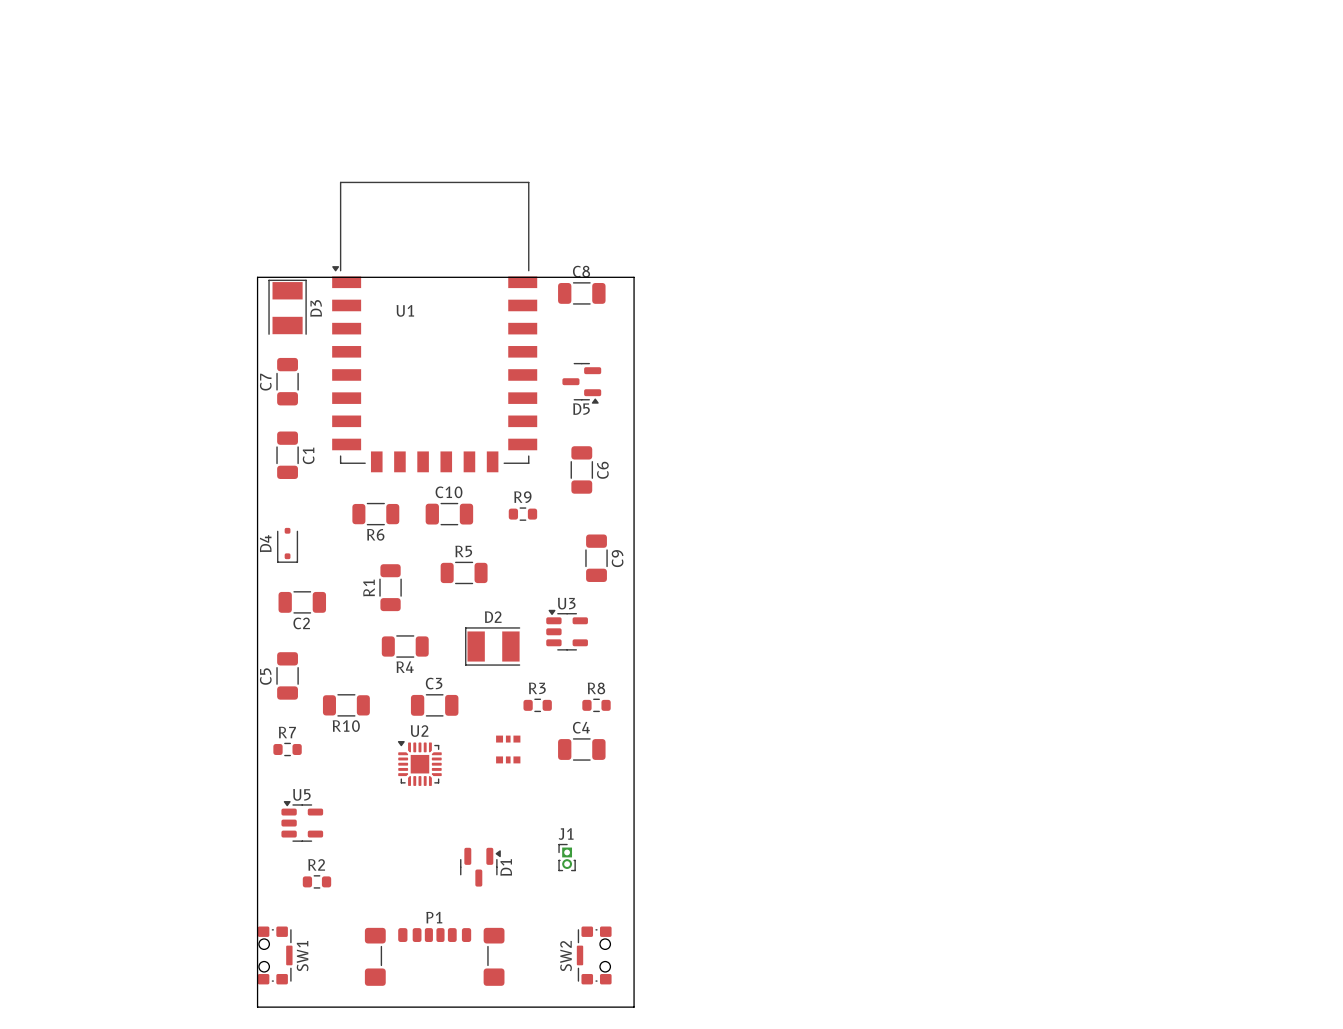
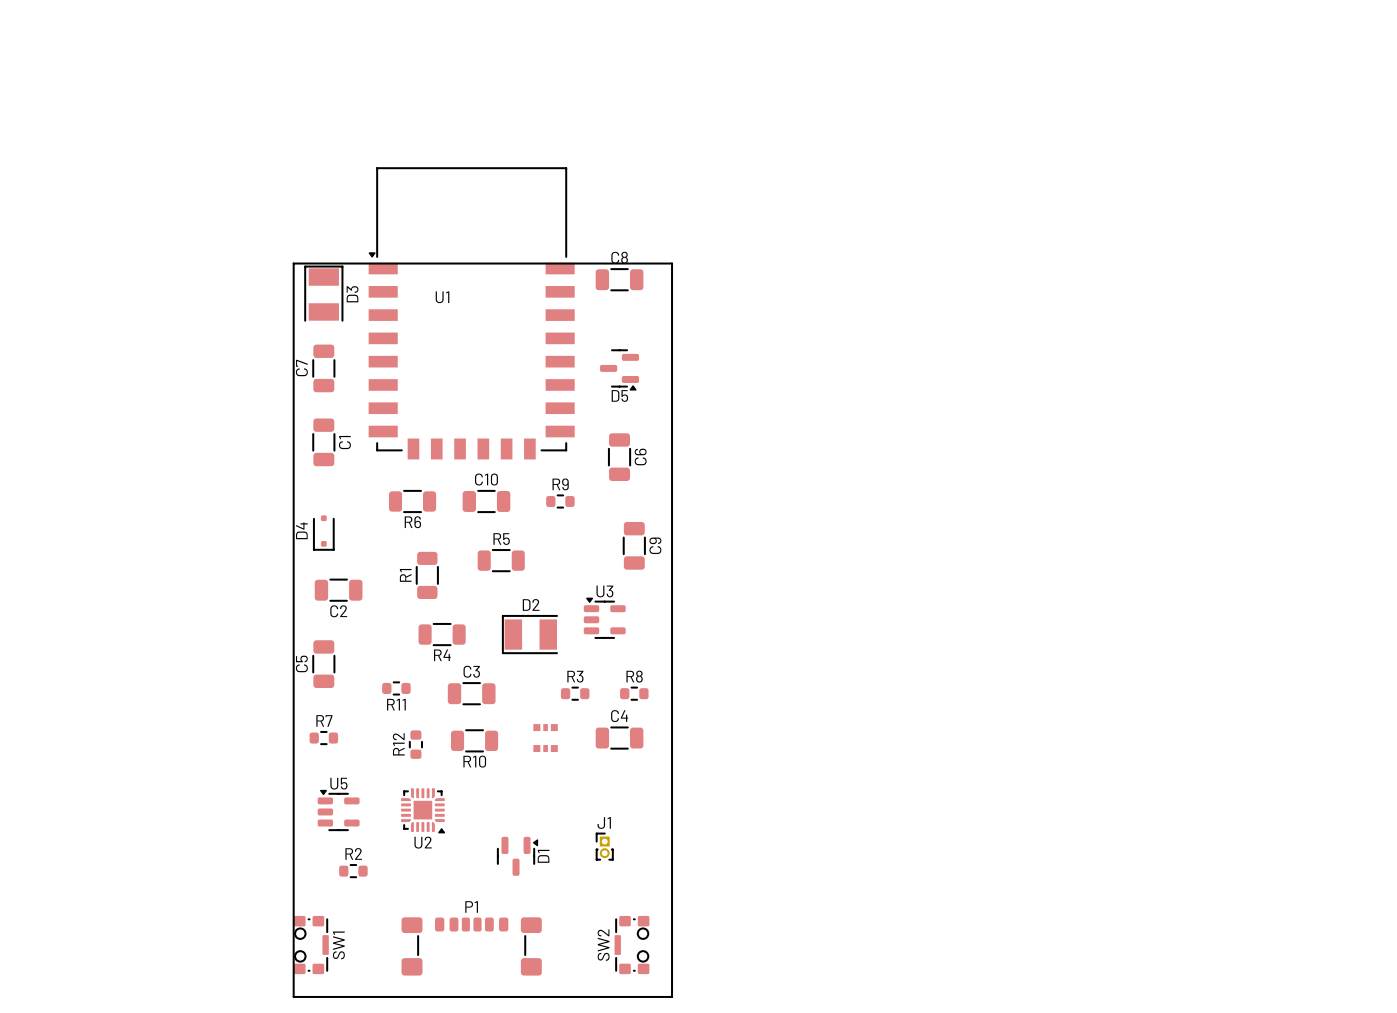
R11: none -> (396, 688)
R10 position: (346, 705) -> (474, 740)
R12: none -> (415, 744)
U2 rotation: 0° (419, 763) -> 180° (423, 810)
U2 position: (419, 763) -> (423, 810)

